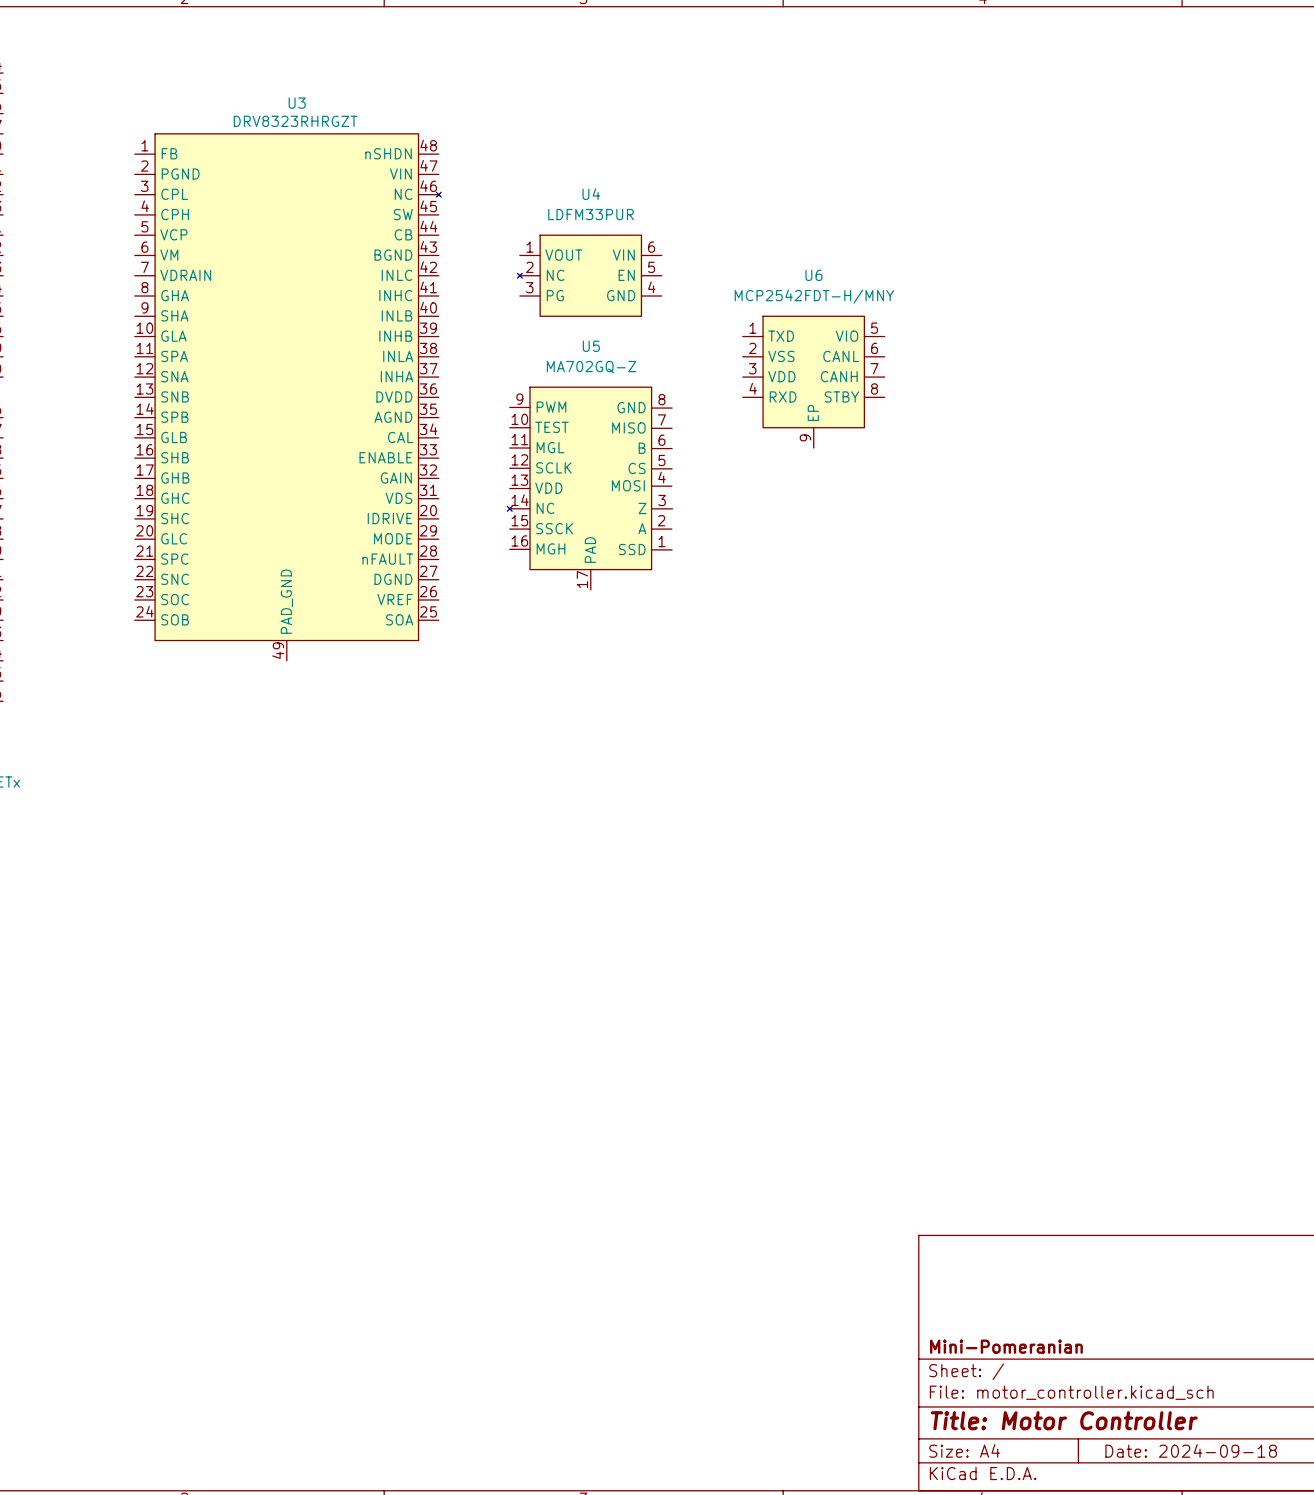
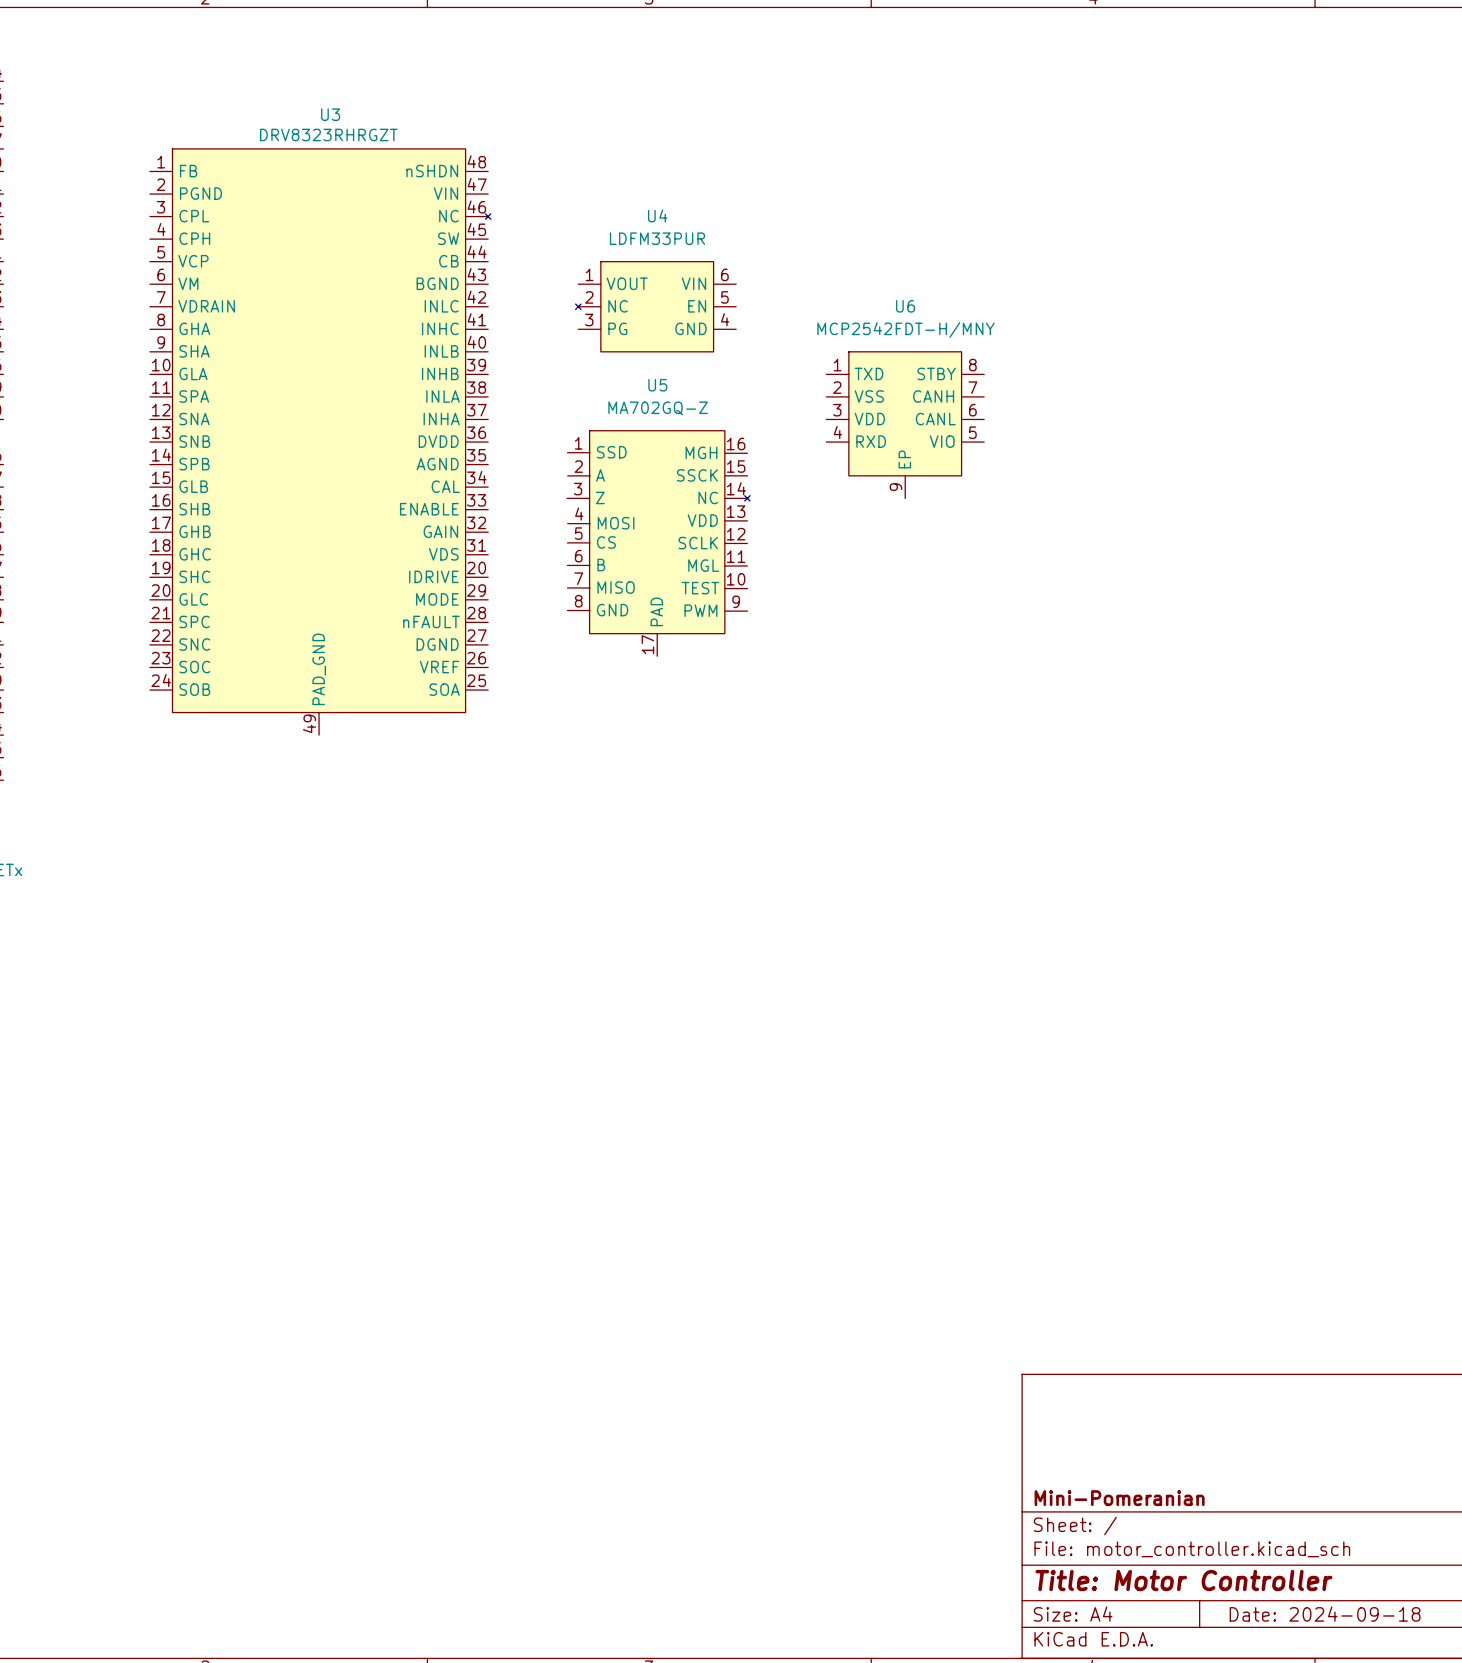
U6 pin number: 5 (874, 328) -> 8 (972, 365)
U6 pin name: VIO (846, 336) -> STBY (936, 373)
U6 pin number: 6 (874, 348) -> 7 (972, 387)
U6 pin name: CANL (841, 356) -> CANH (933, 396)
U6 pin number: 7 (874, 368) -> 6 (972, 410)
U6 pin name: CANH (839, 376) -> CANL (935, 419)
U5 symbol: [507, 387, 673, 590] -> [567, 430, 751, 657]
U6 pin number: 8 (874, 388) -> 5 (972, 432)
U6 pin name: STBY (841, 396) -> VIO (942, 441)

